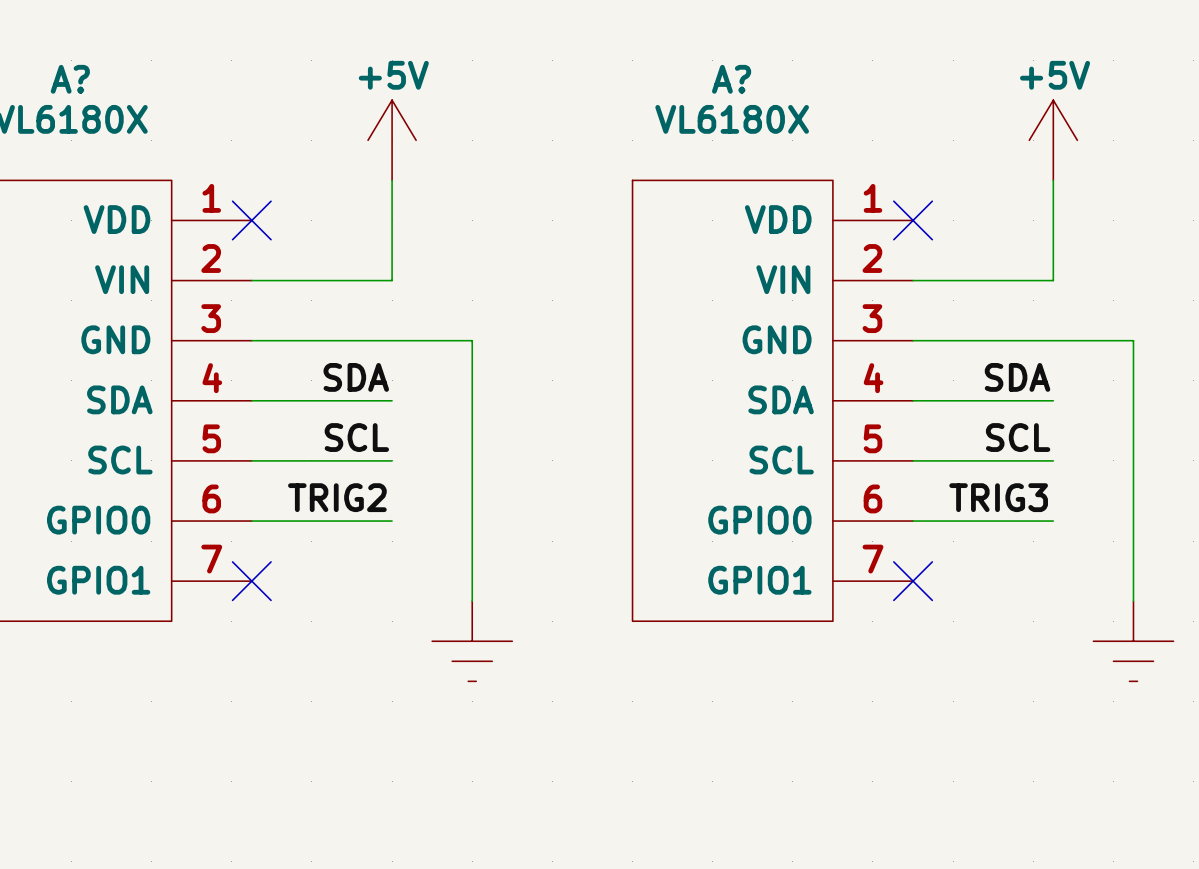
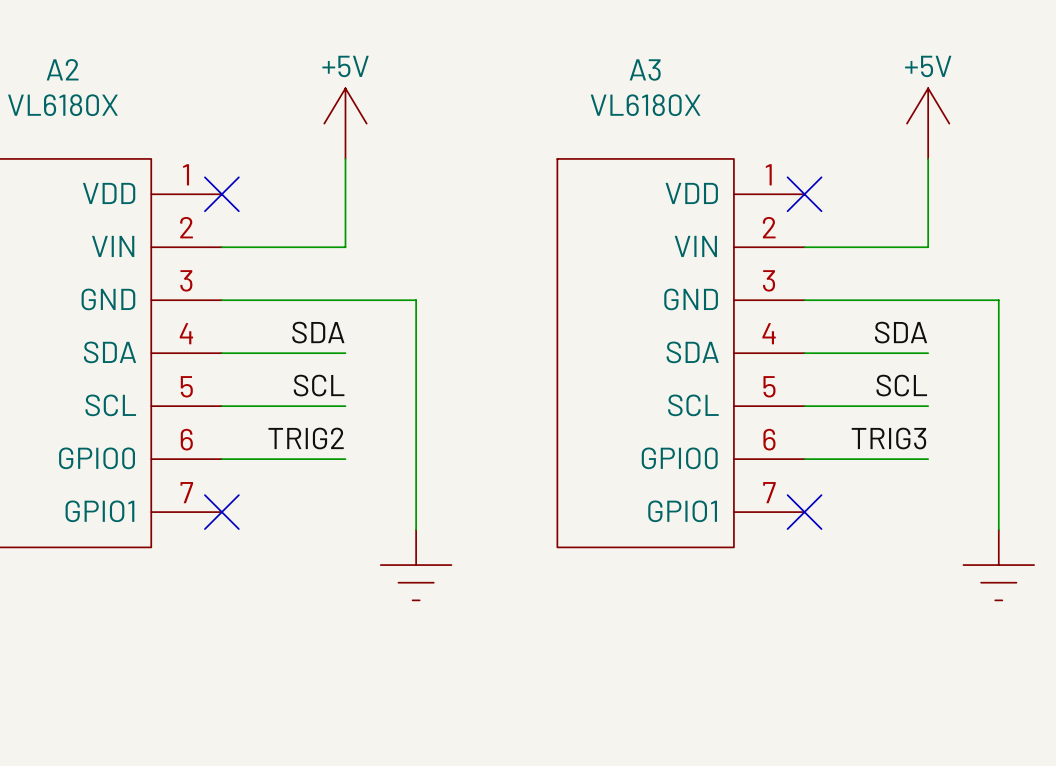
A? name: A? (70, 79) -> A2 (62, 69)
A? name: A? (731, 79) -> A3 (645, 70)

